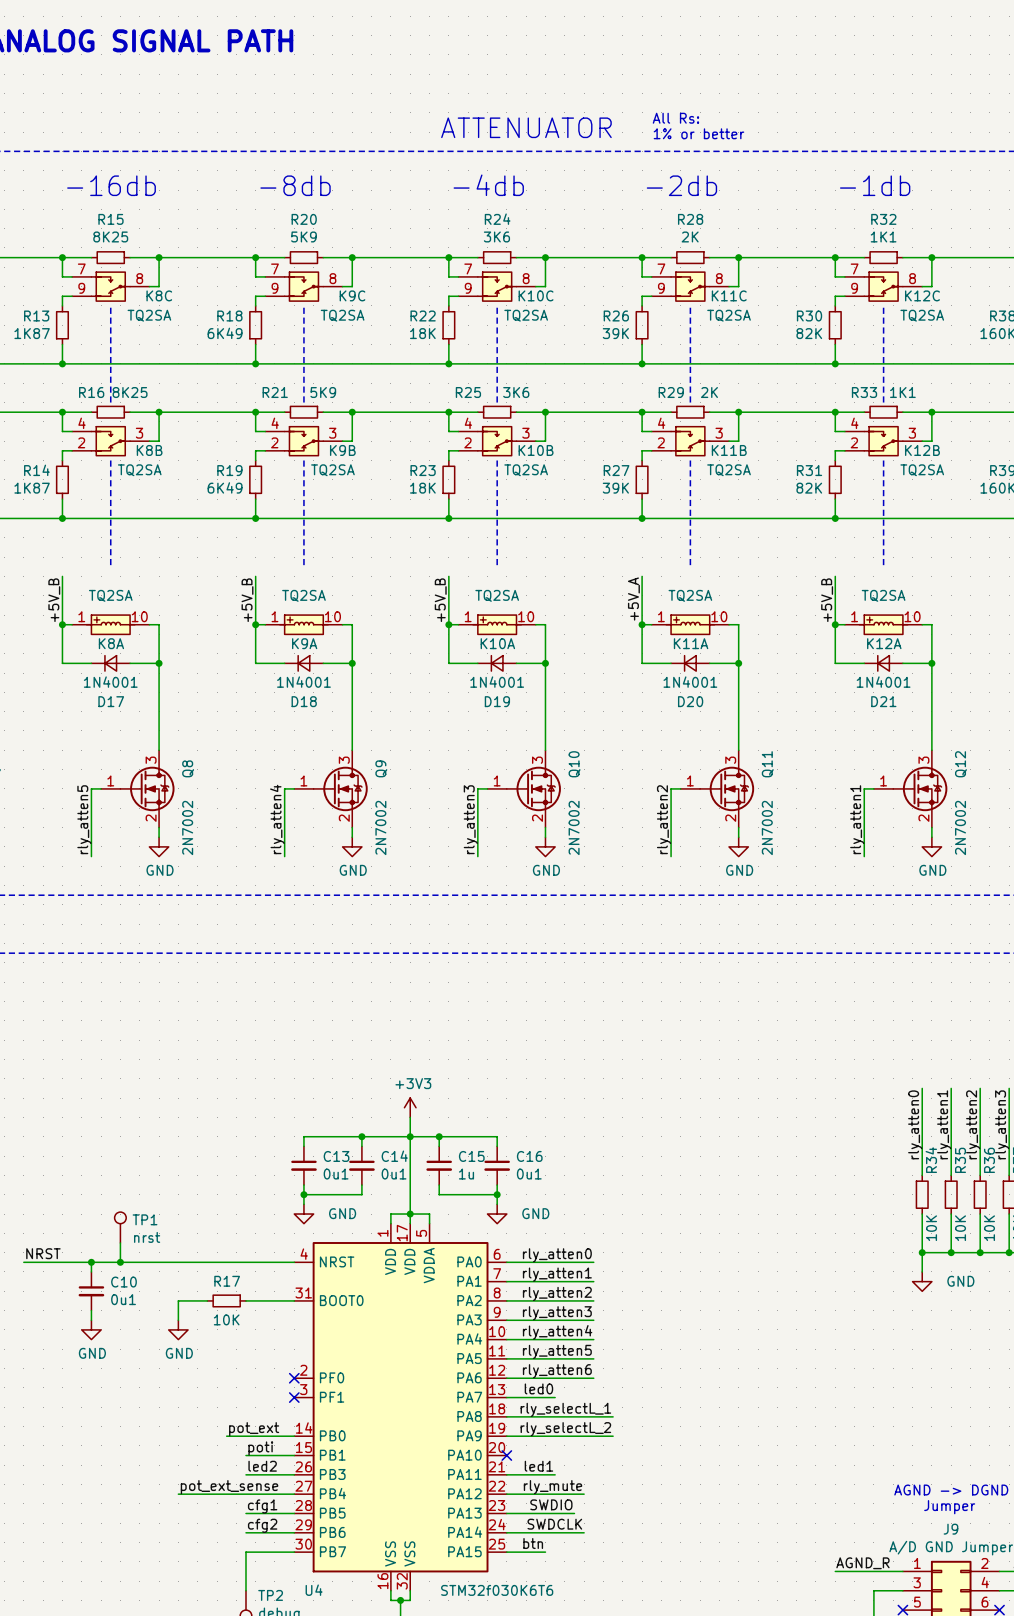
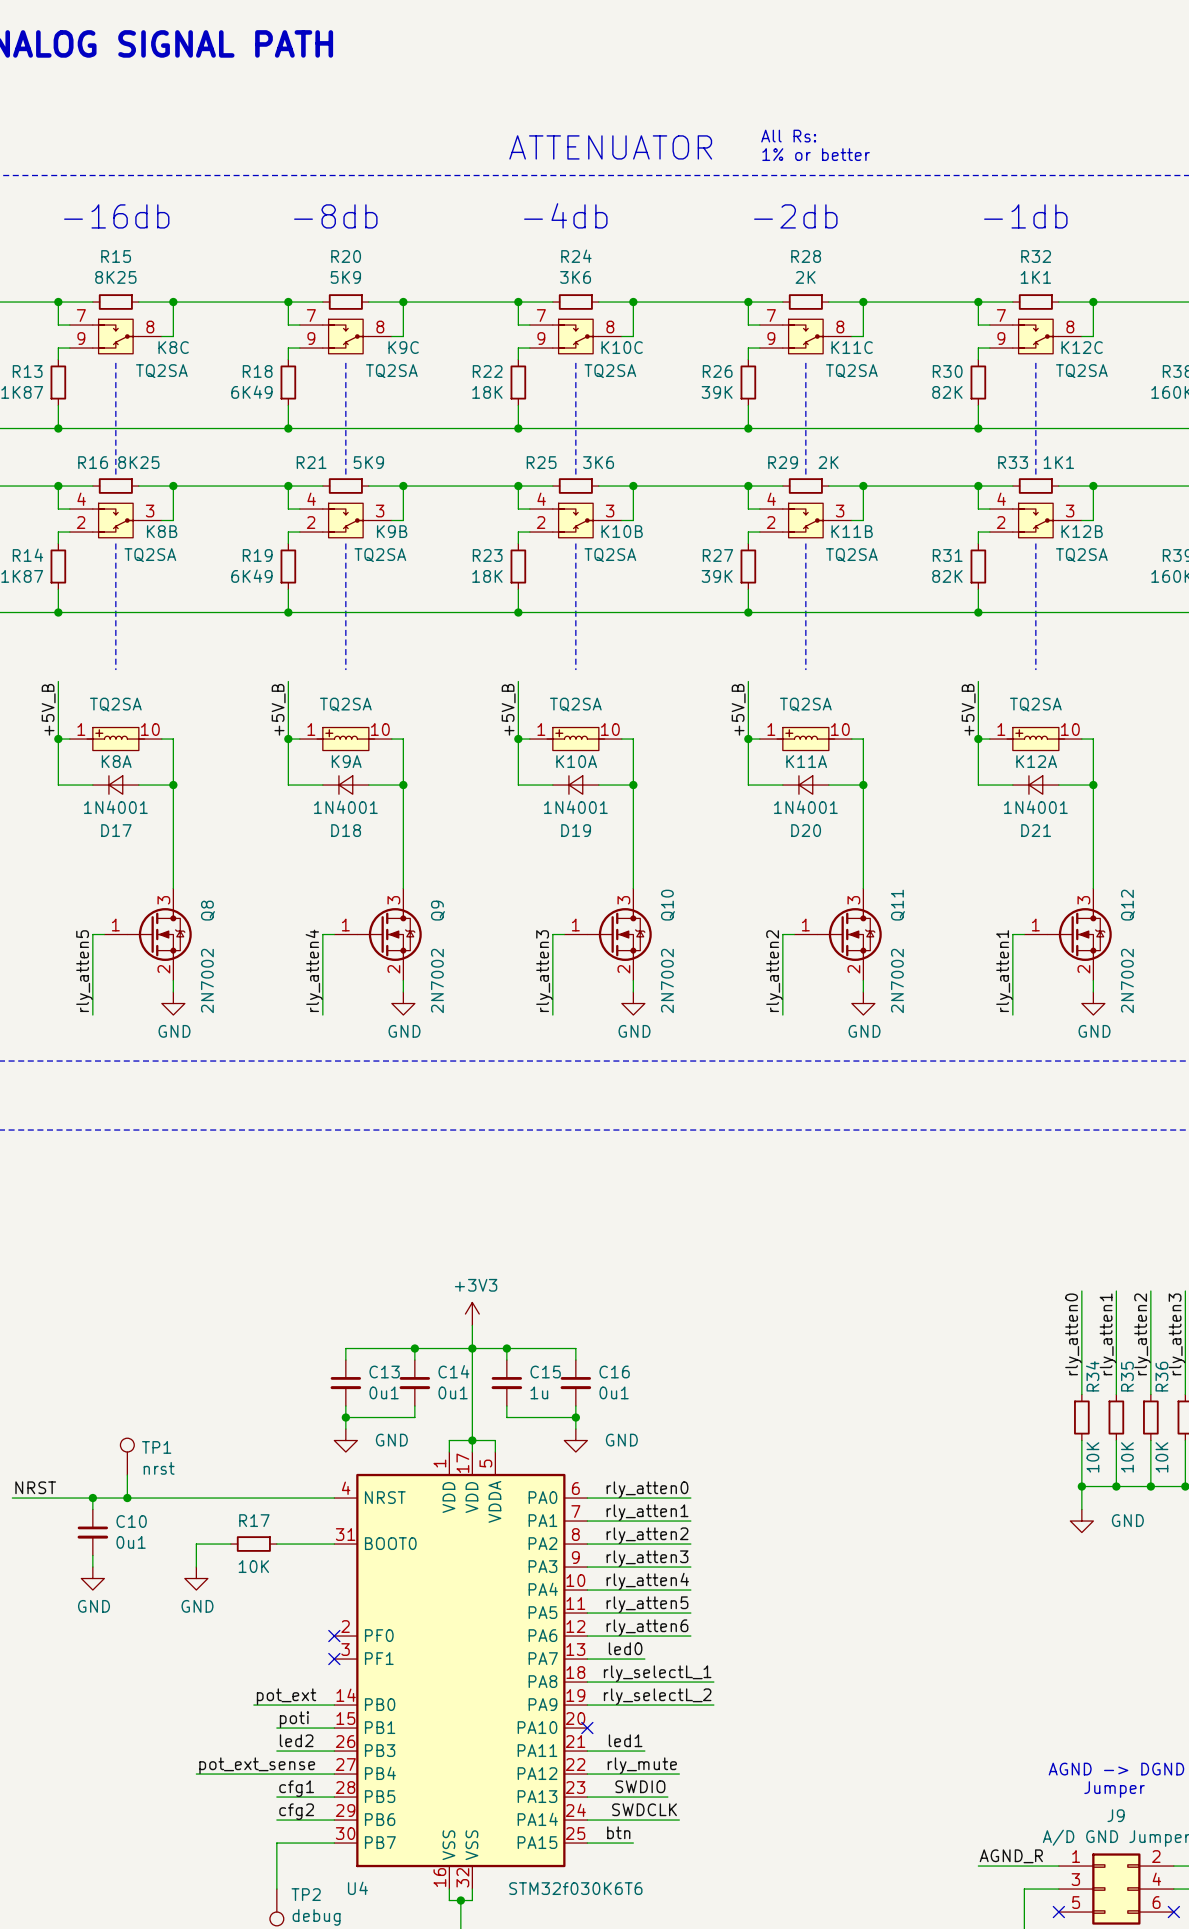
label: +5V_A (633, 599) -> +5V_B (738, 709)

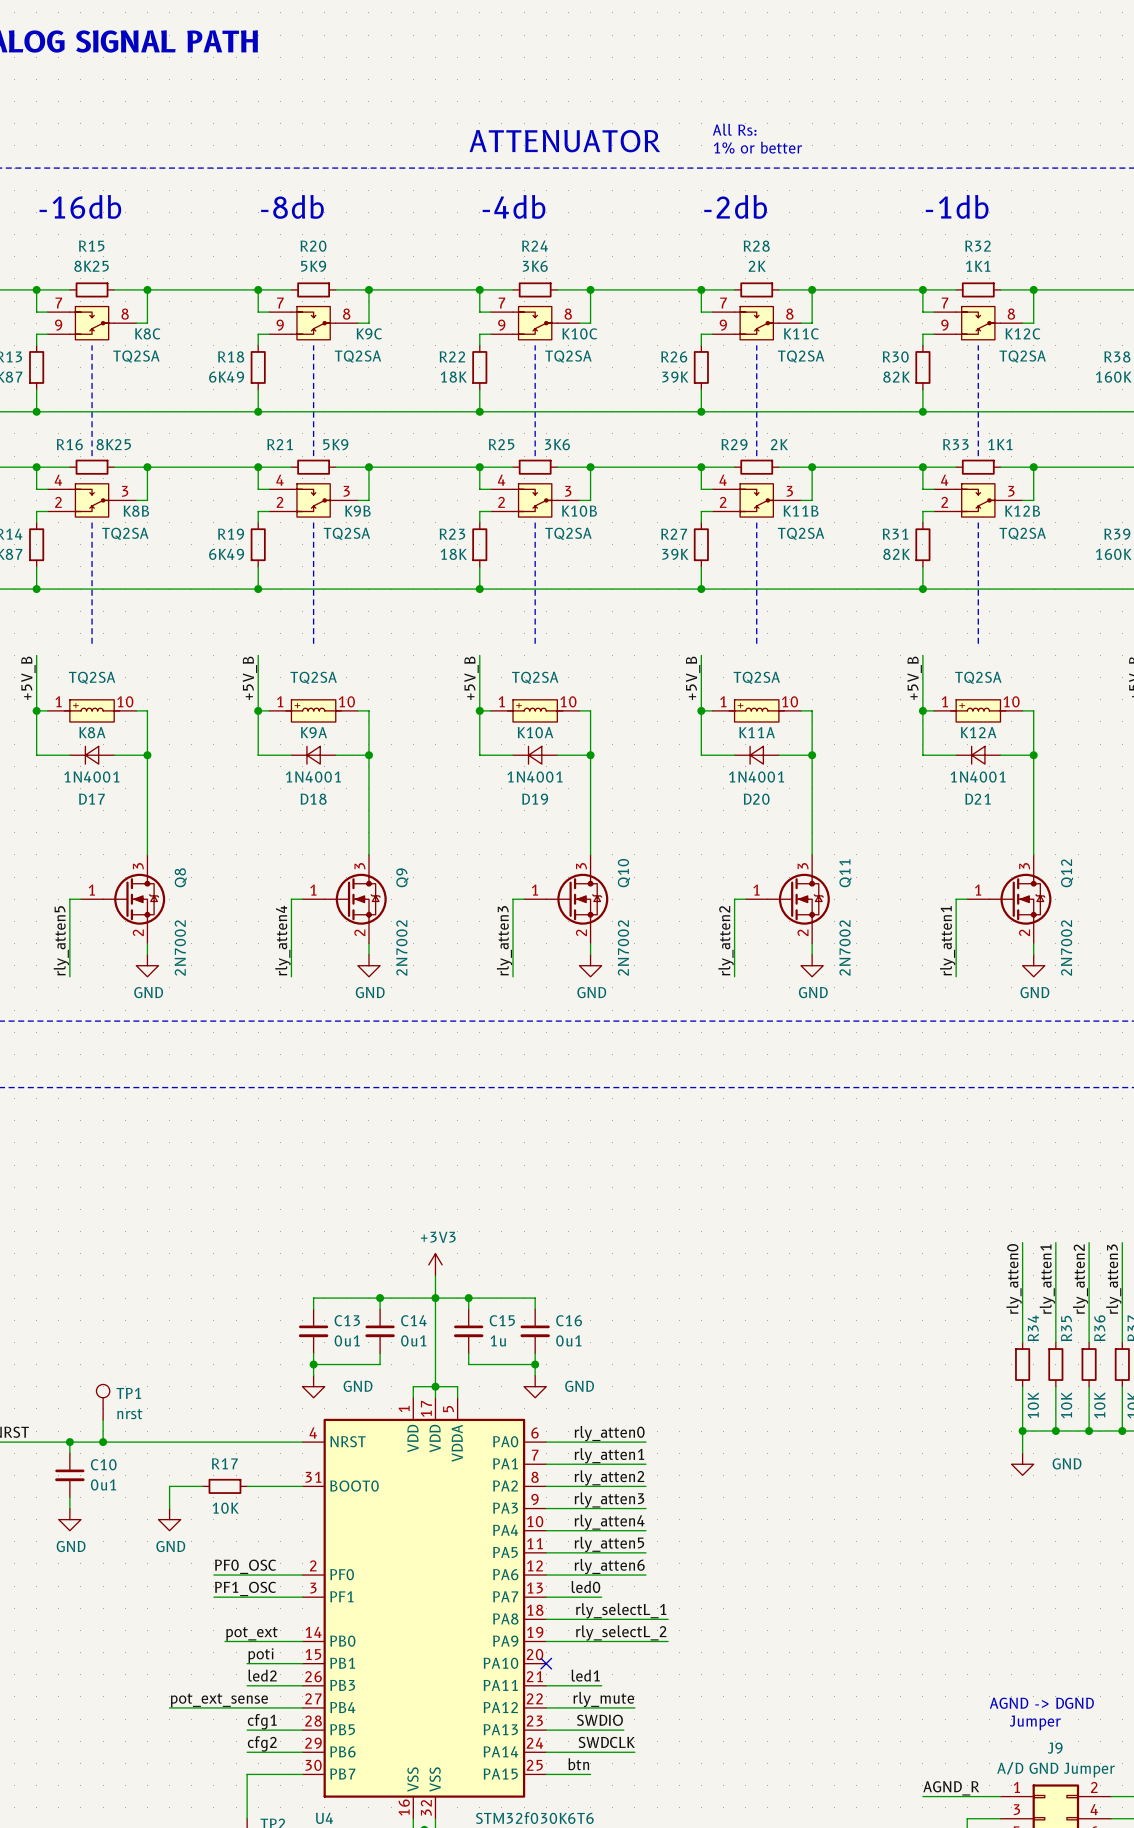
label: none -> PF0_OSC (245, 1566)
wire: none -> (213, 1575) (302, 1575)
no-connect mark: (334, 1636) -> none
label: none -> PF1_OSC (245, 1588)
wire: none -> (213, 1597) (302, 1597)
no-connect mark: (334, 1659) -> none

